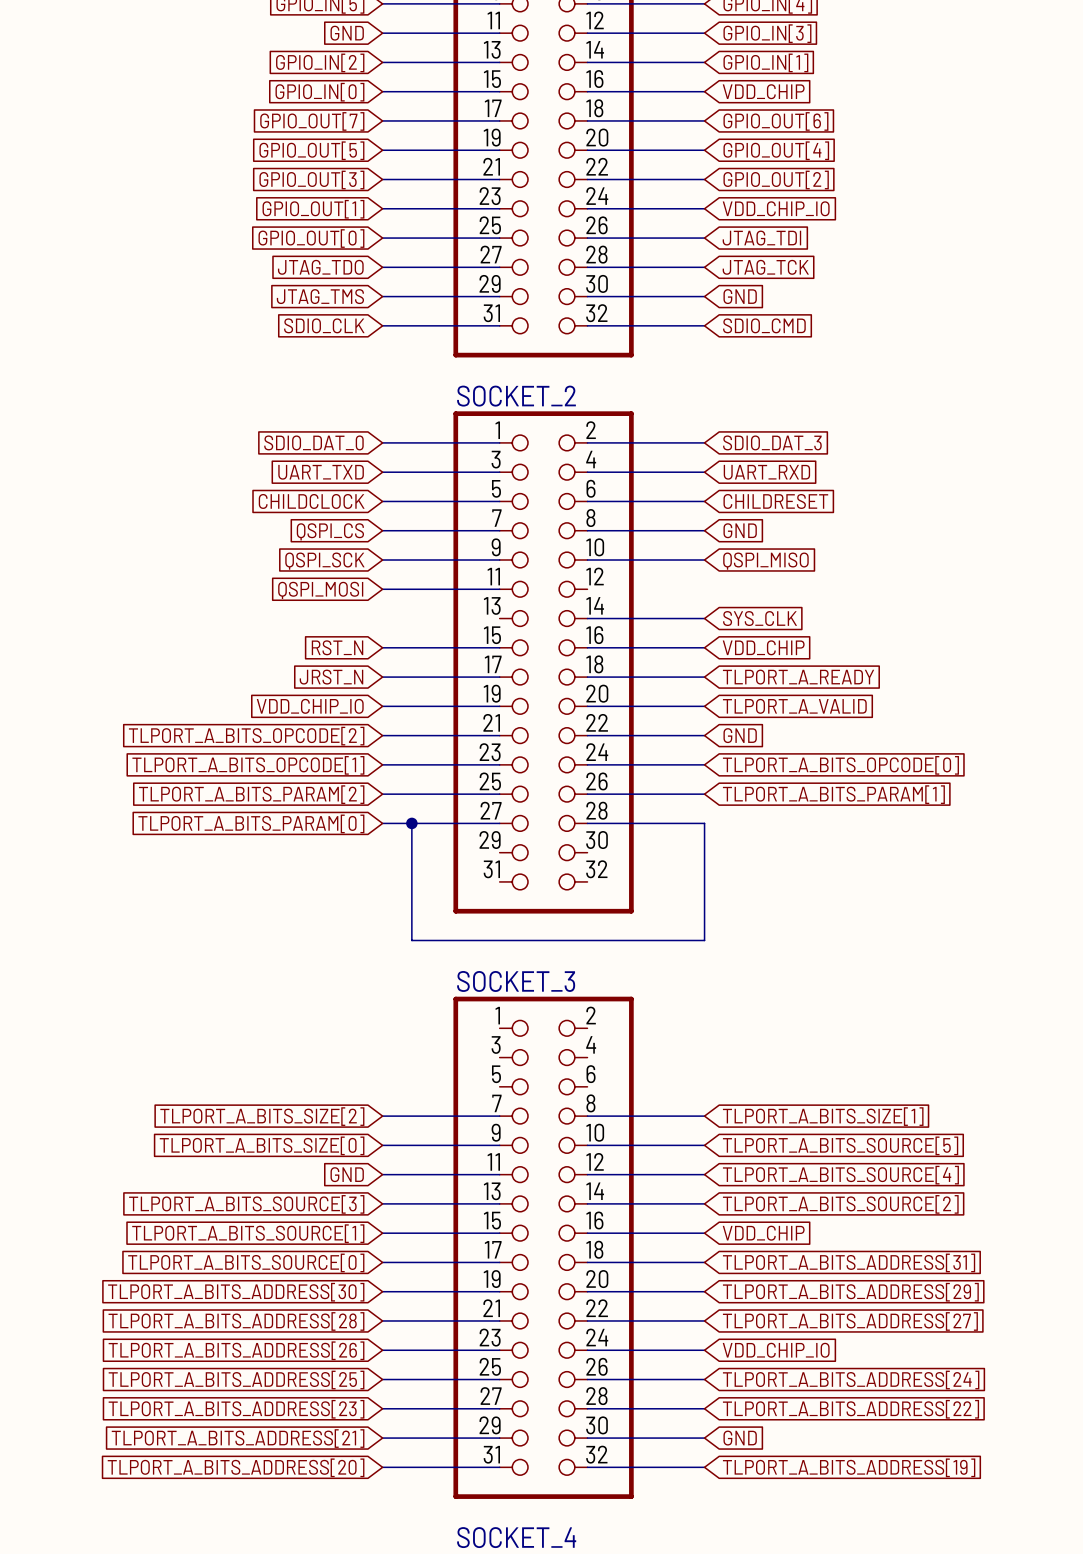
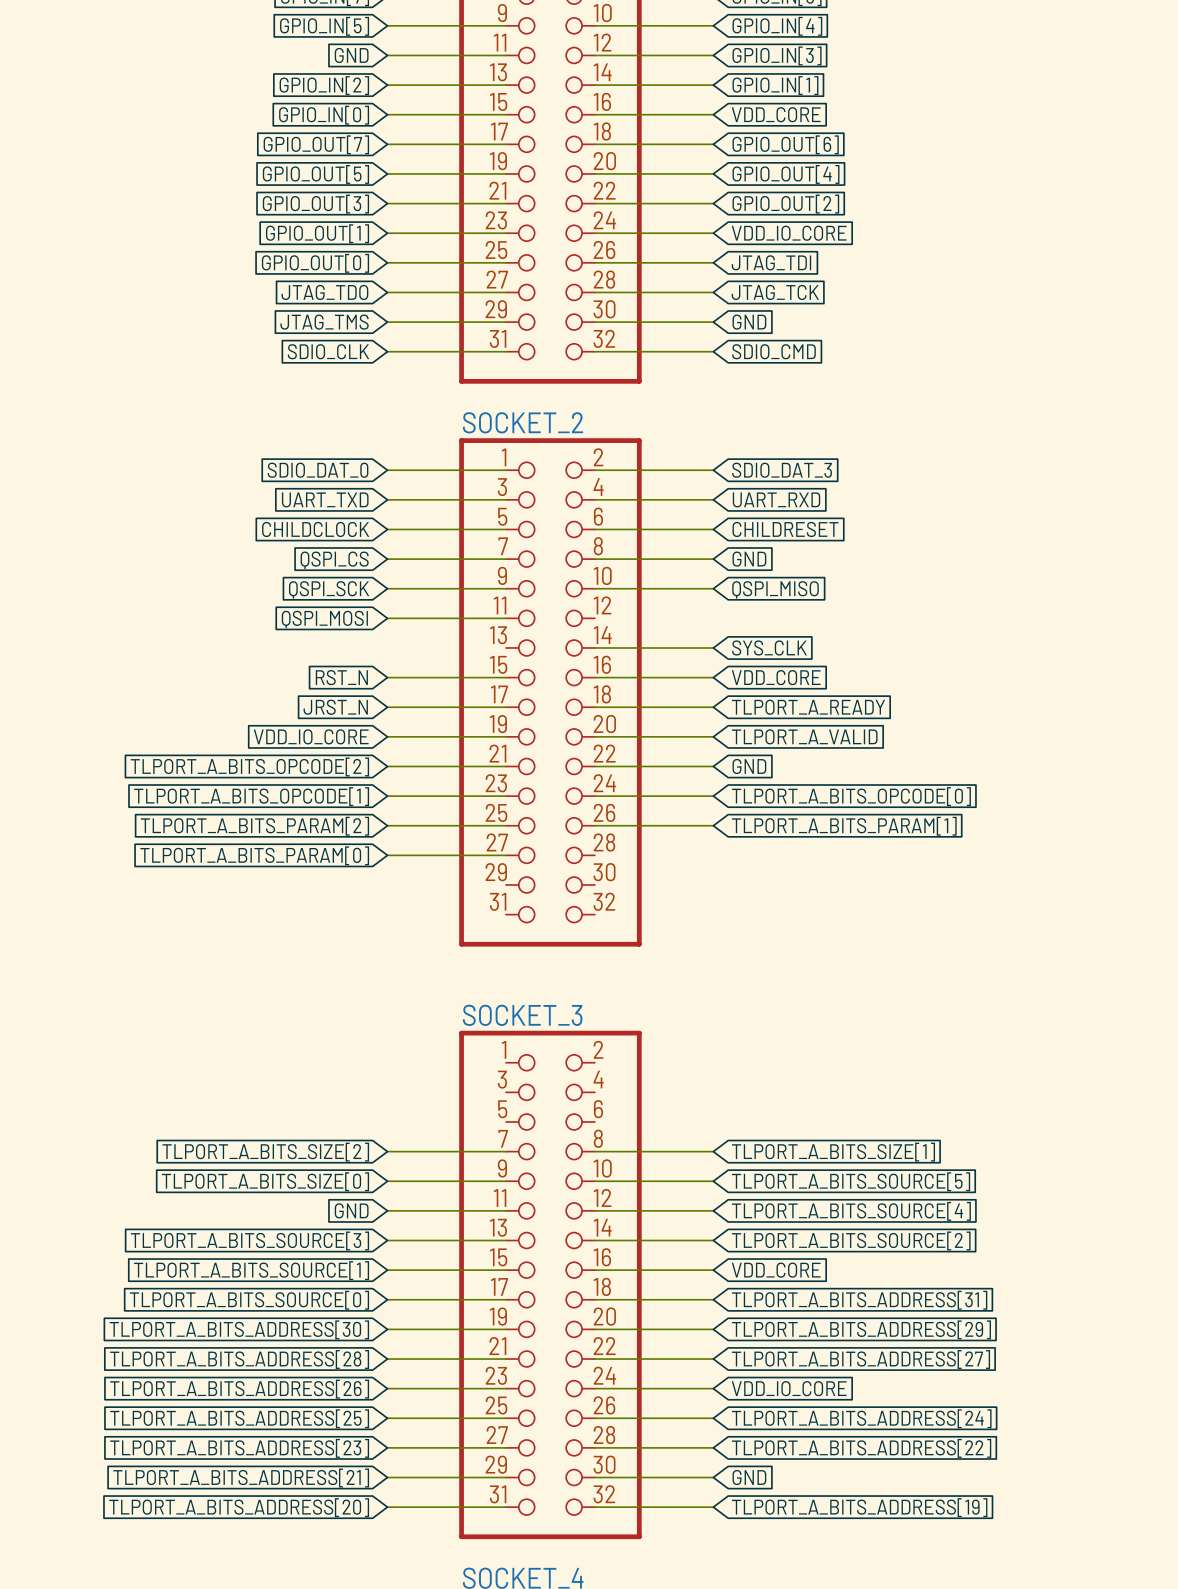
global label: VDD_CHIP (763, 91) -> VDD_CORE (776, 114)
global label: VDD_CHIP_IO (776, 208) -> VDD_IO_CORE (789, 233)
global label: VDD_CHIP (763, 647) -> VDD_CORE (776, 677)
global label: VDD_CHIP_IO (310, 706) -> VDD_IO_CORE (311, 736)
wire: (411, 823) (411, 940) (704, 940) (704, 823) (587, 823) -> none
junction: (411, 823) -> none
global label: VDD_CHIP (763, 1233) -> VDD_CORE (776, 1270)
global label: VDD_CHIP_IO (776, 1350) -> VDD_IO_CORE (789, 1388)

